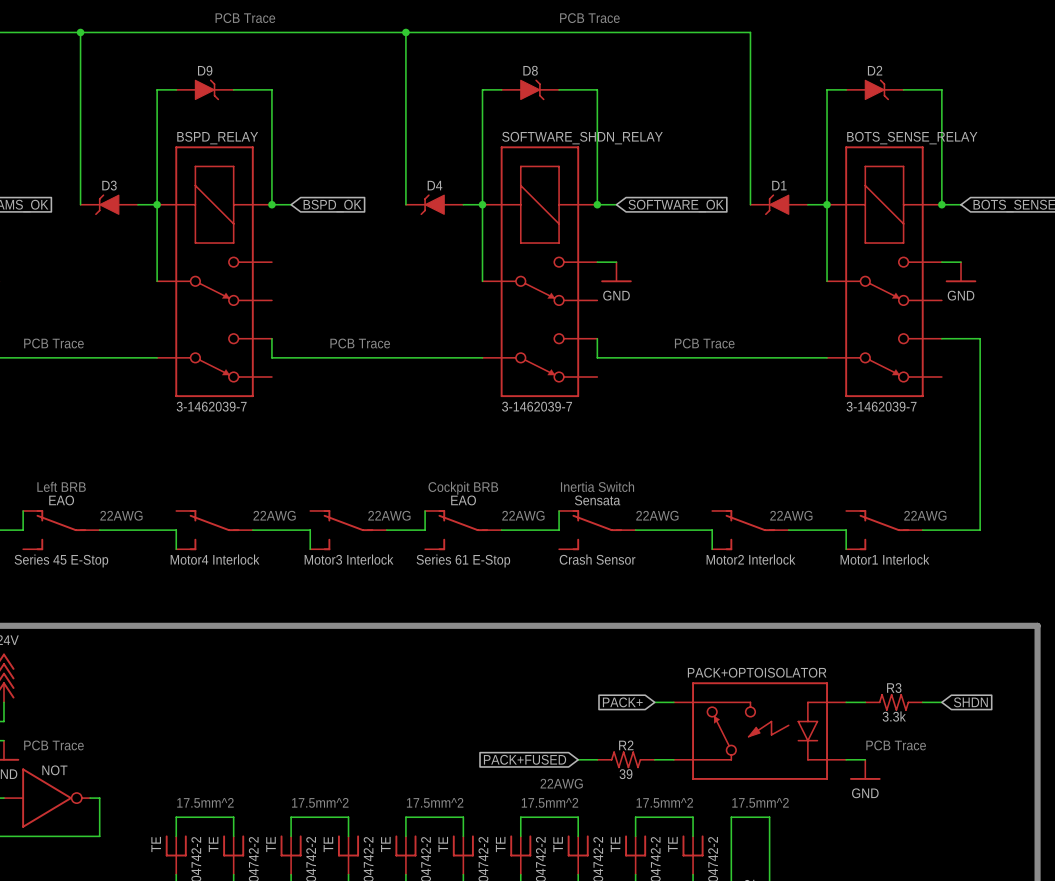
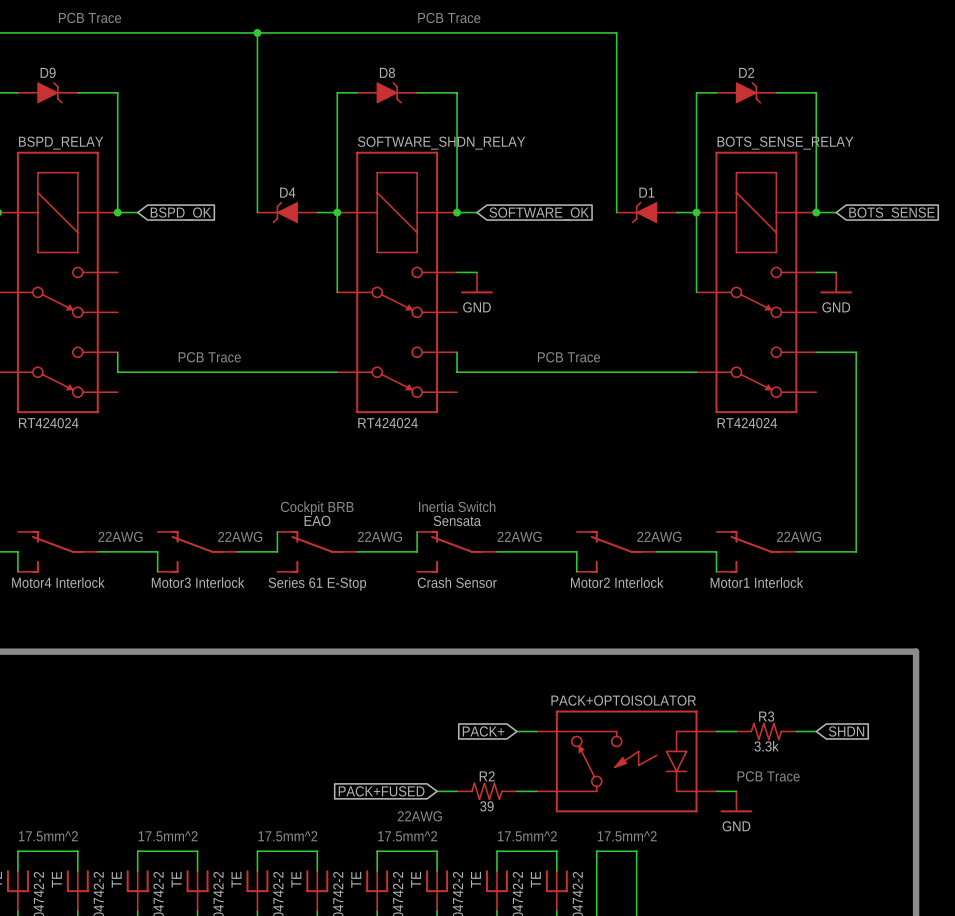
BSPD_RELAY text: 3-1462039-7 (211, 406) -> RT424024 (48, 423)
SOFTWARE_SHDN_RELAY text: 3-1462039-7 (537, 406) -> RT424024 (388, 423)
BOTS_SENSE_RELAY text: 3-1462039-7 (881, 406) -> RT424024 (747, 423)

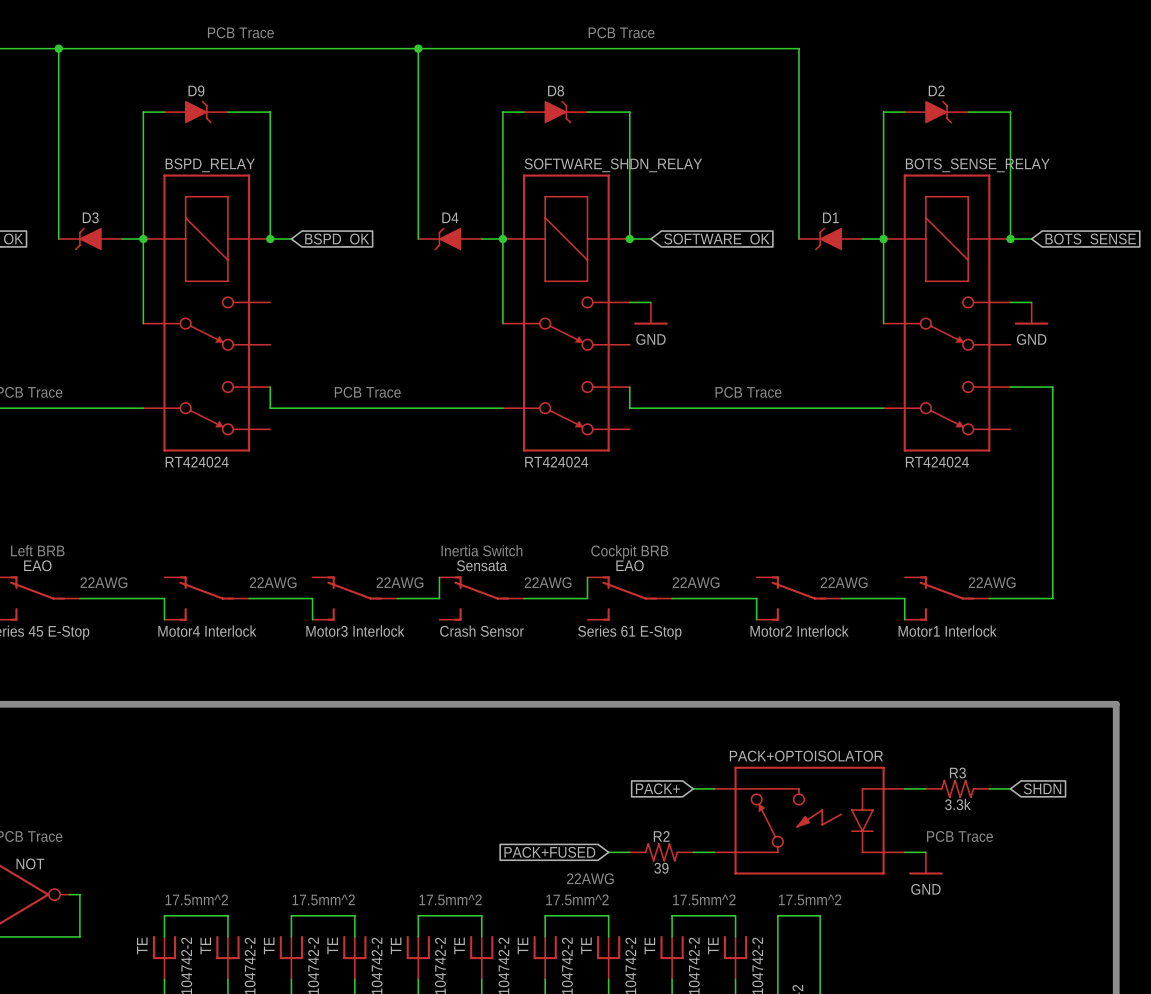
text: Inertia Switch (457, 506) -> Cockpit BRB (629, 552)
text: Cockpit BRB (317, 508) -> Inertia Switch (481, 550)
part text: EAO (317, 520) -> Sensata (482, 565)
part text: Sensata (457, 520) -> EAO (630, 565)
part text: Crash Sensor (457, 582) -> Series 61 E-Stop (629, 632)
part text: Series 61 E-Stop (317, 584) -> Crash Sensor (481, 631)

